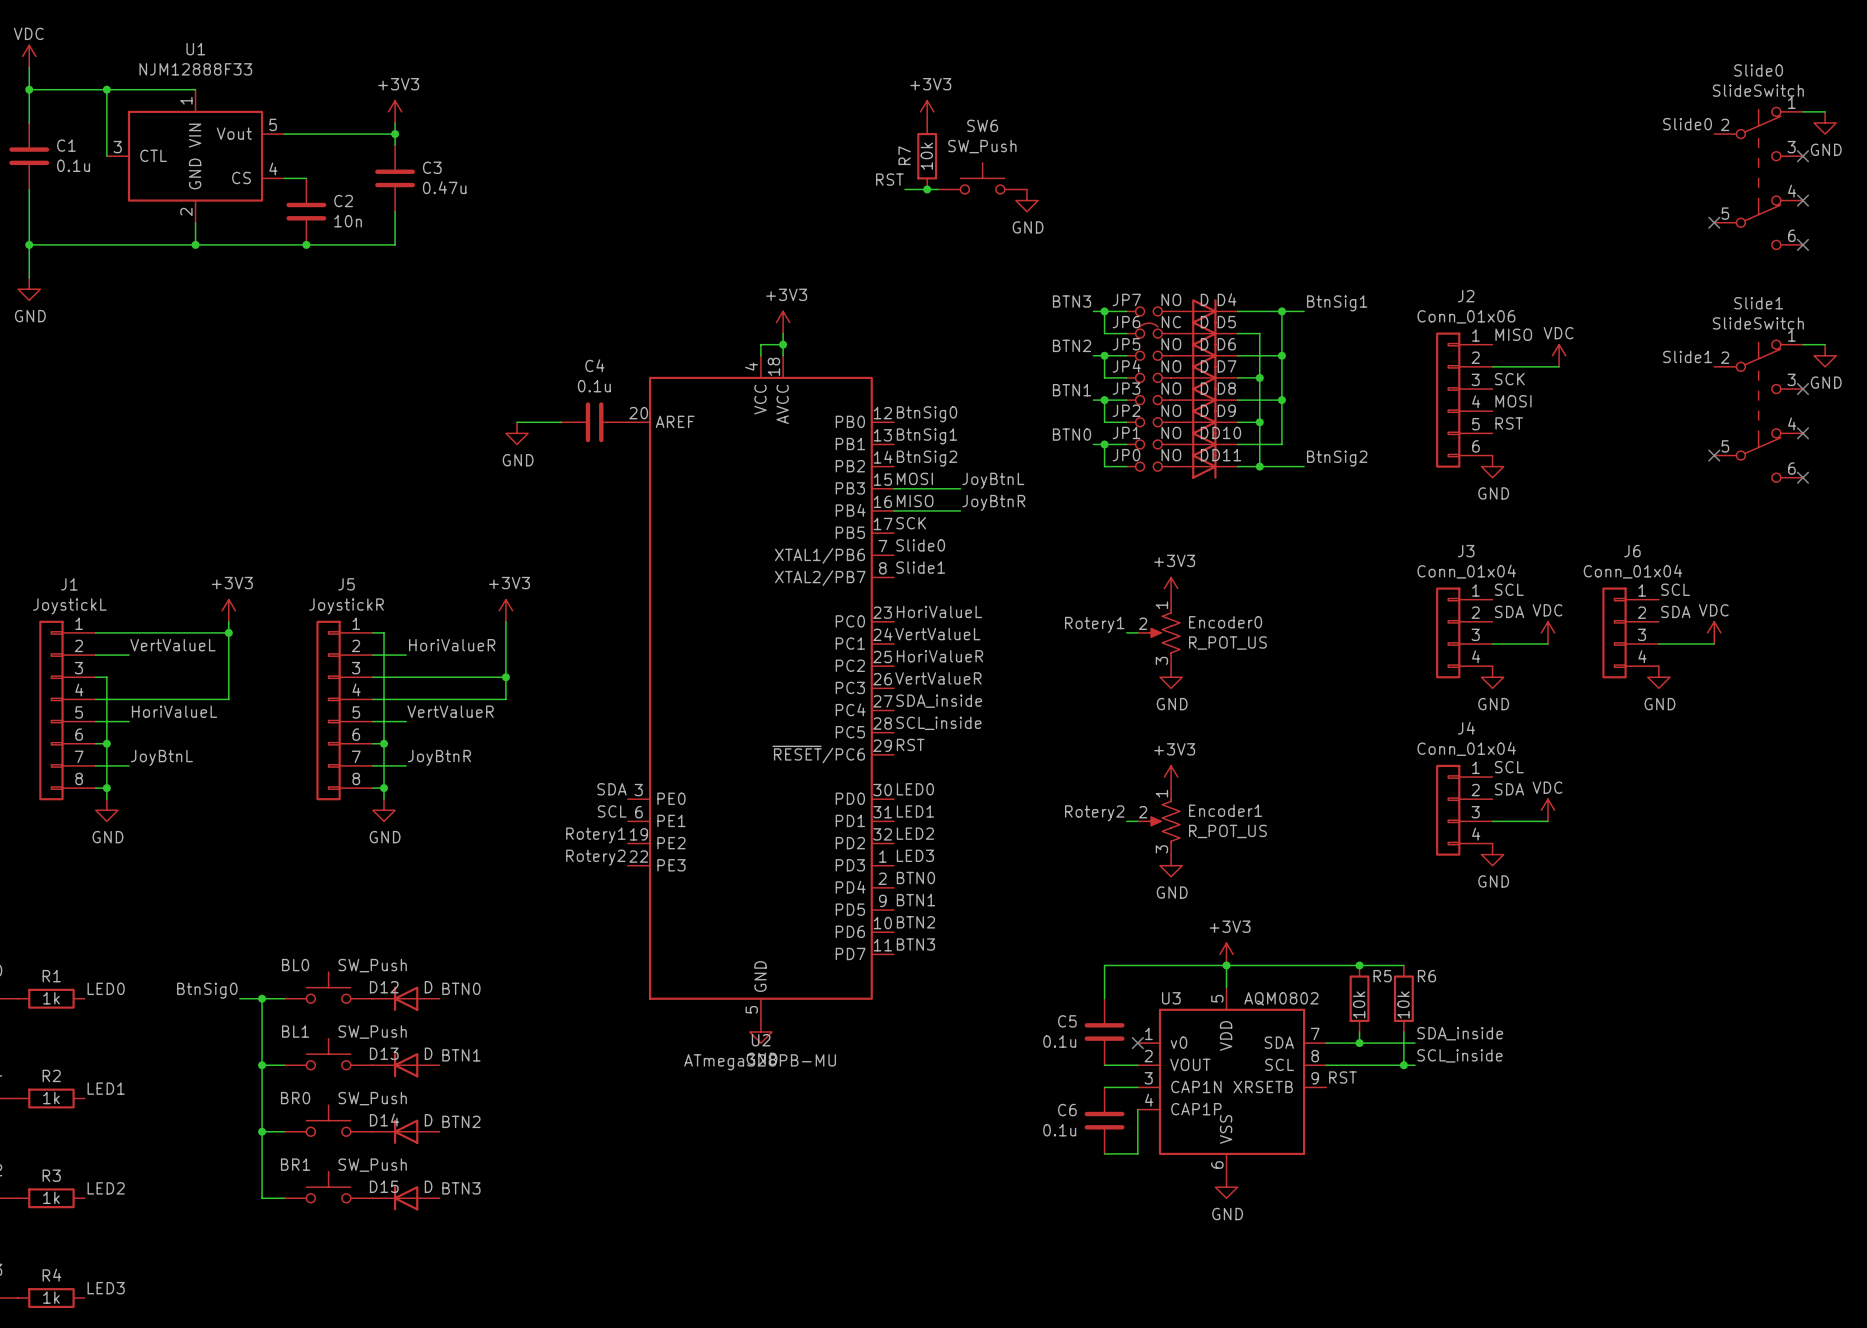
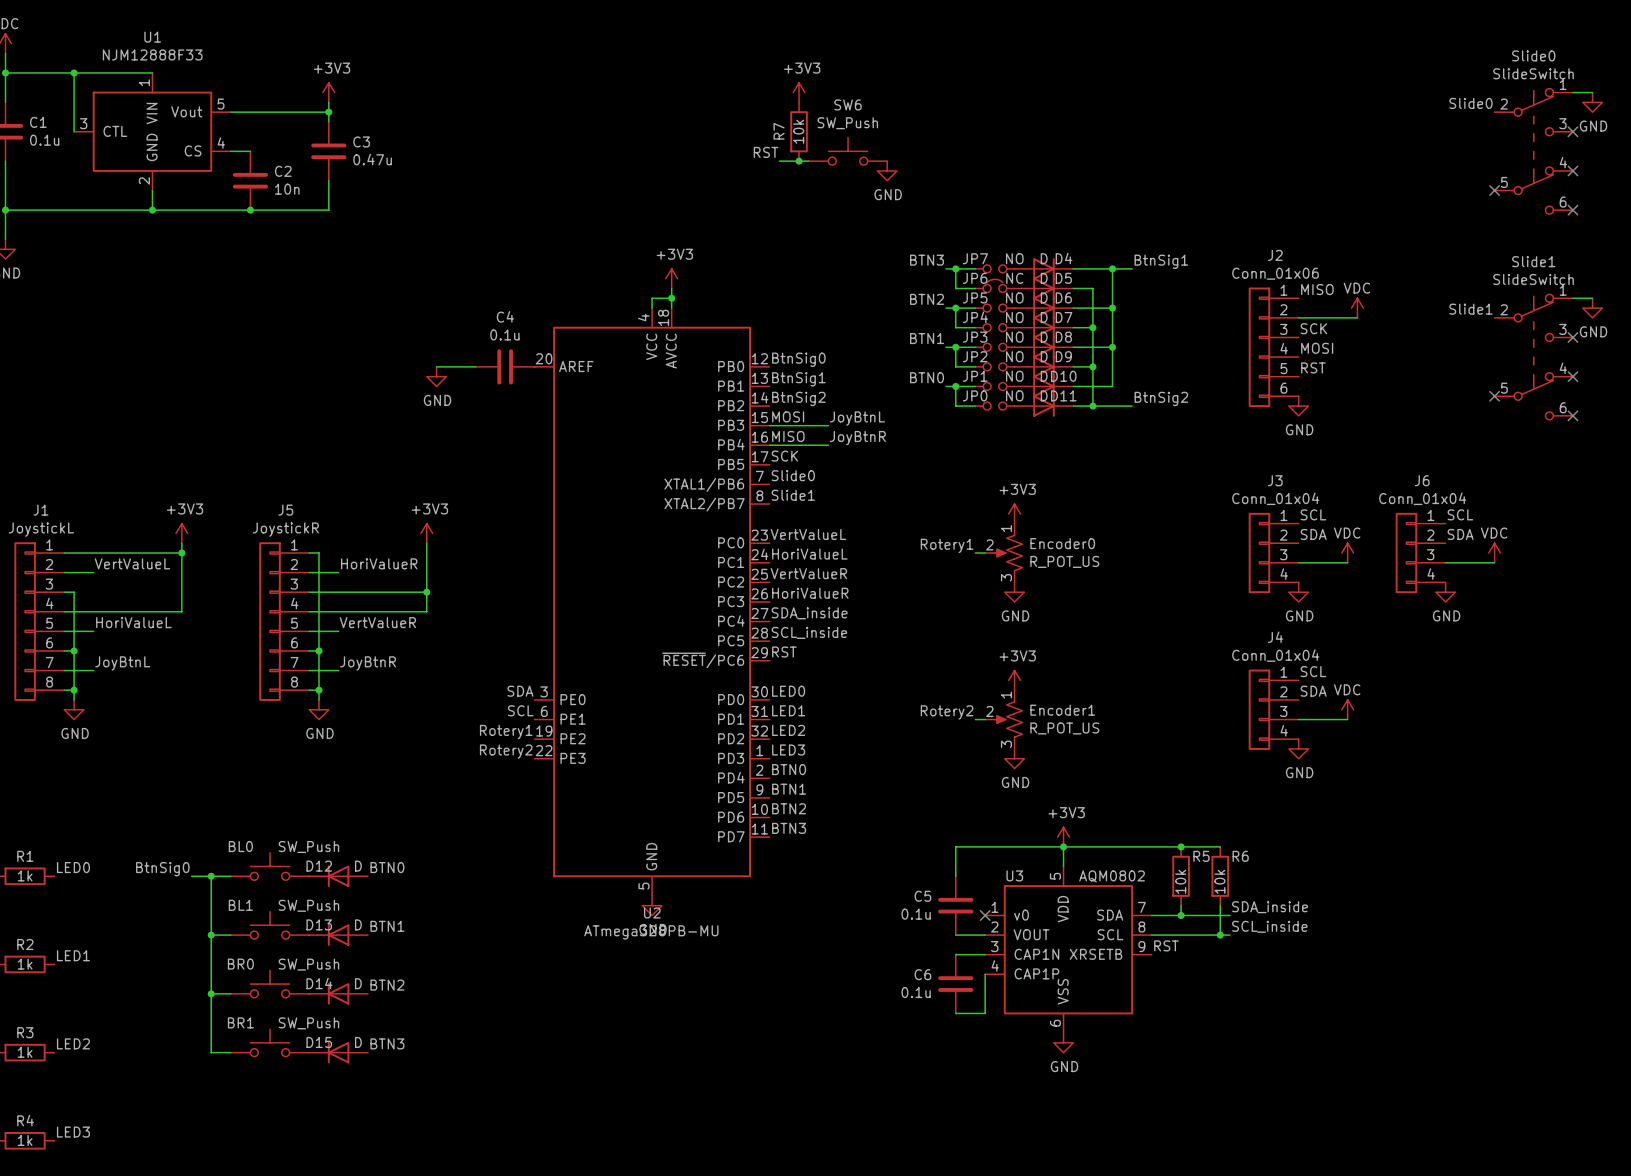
label: HoriValueL (939, 611) -> VertValueL (808, 534)
label: VertValueL (937, 634) -> HoriValueL (809, 554)
label: HoriValueR (939, 656) -> VertValueR (808, 573)
label: VertValueR (938, 678) -> HoriValueR (810, 593)

